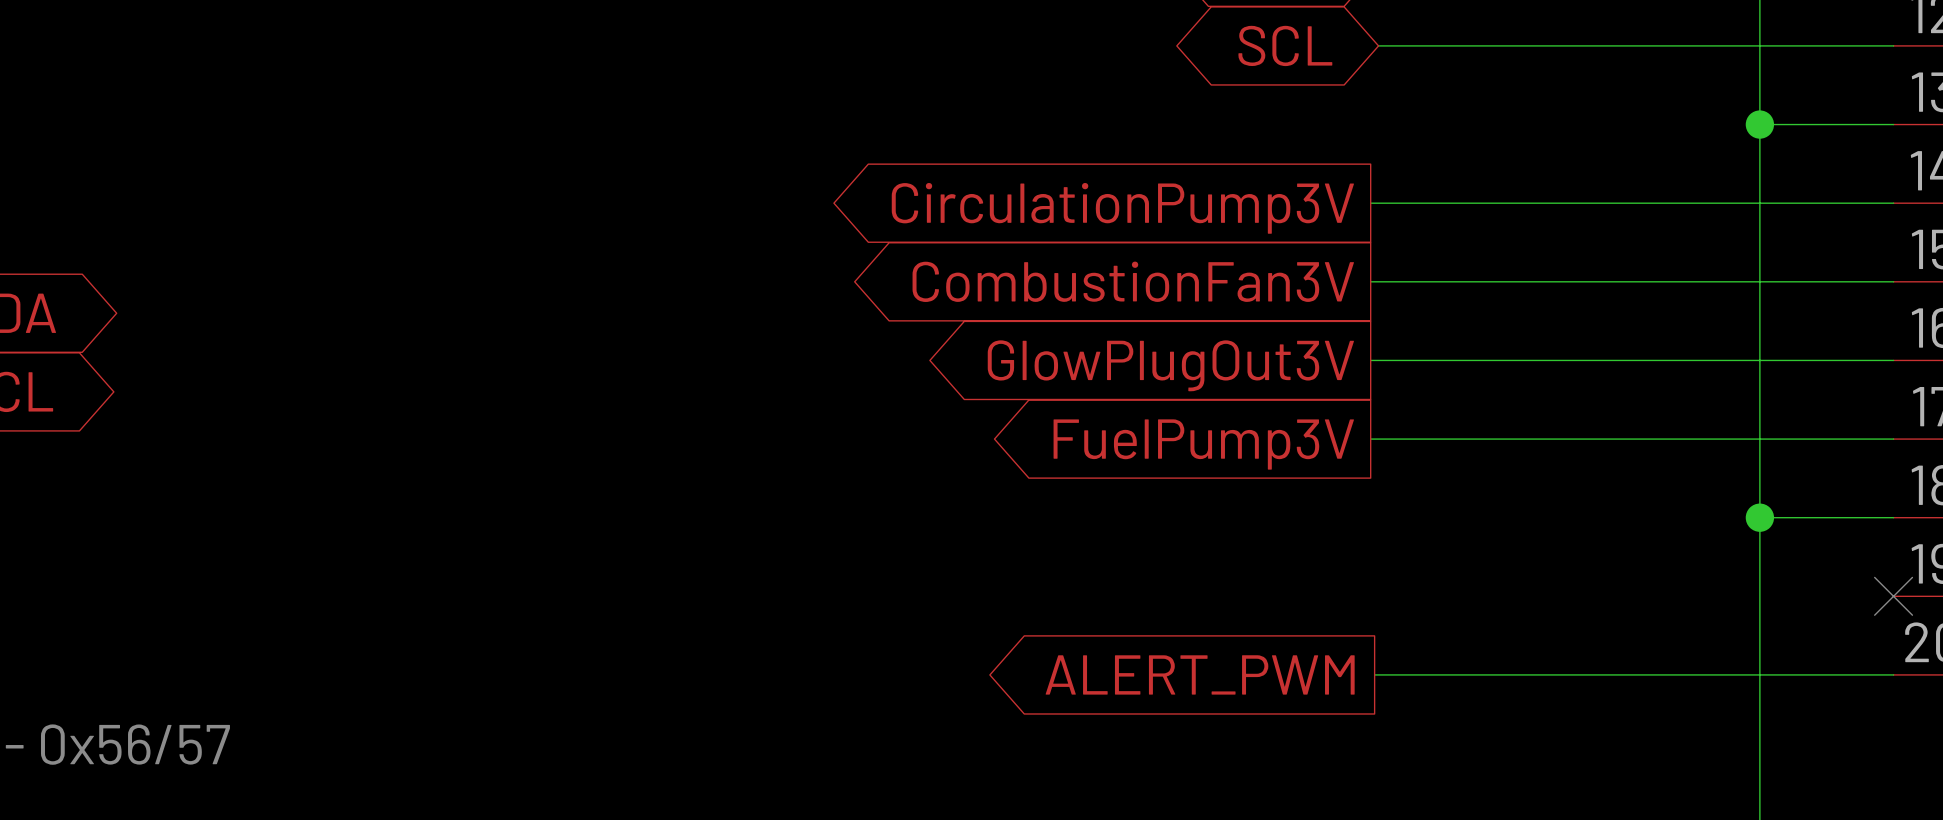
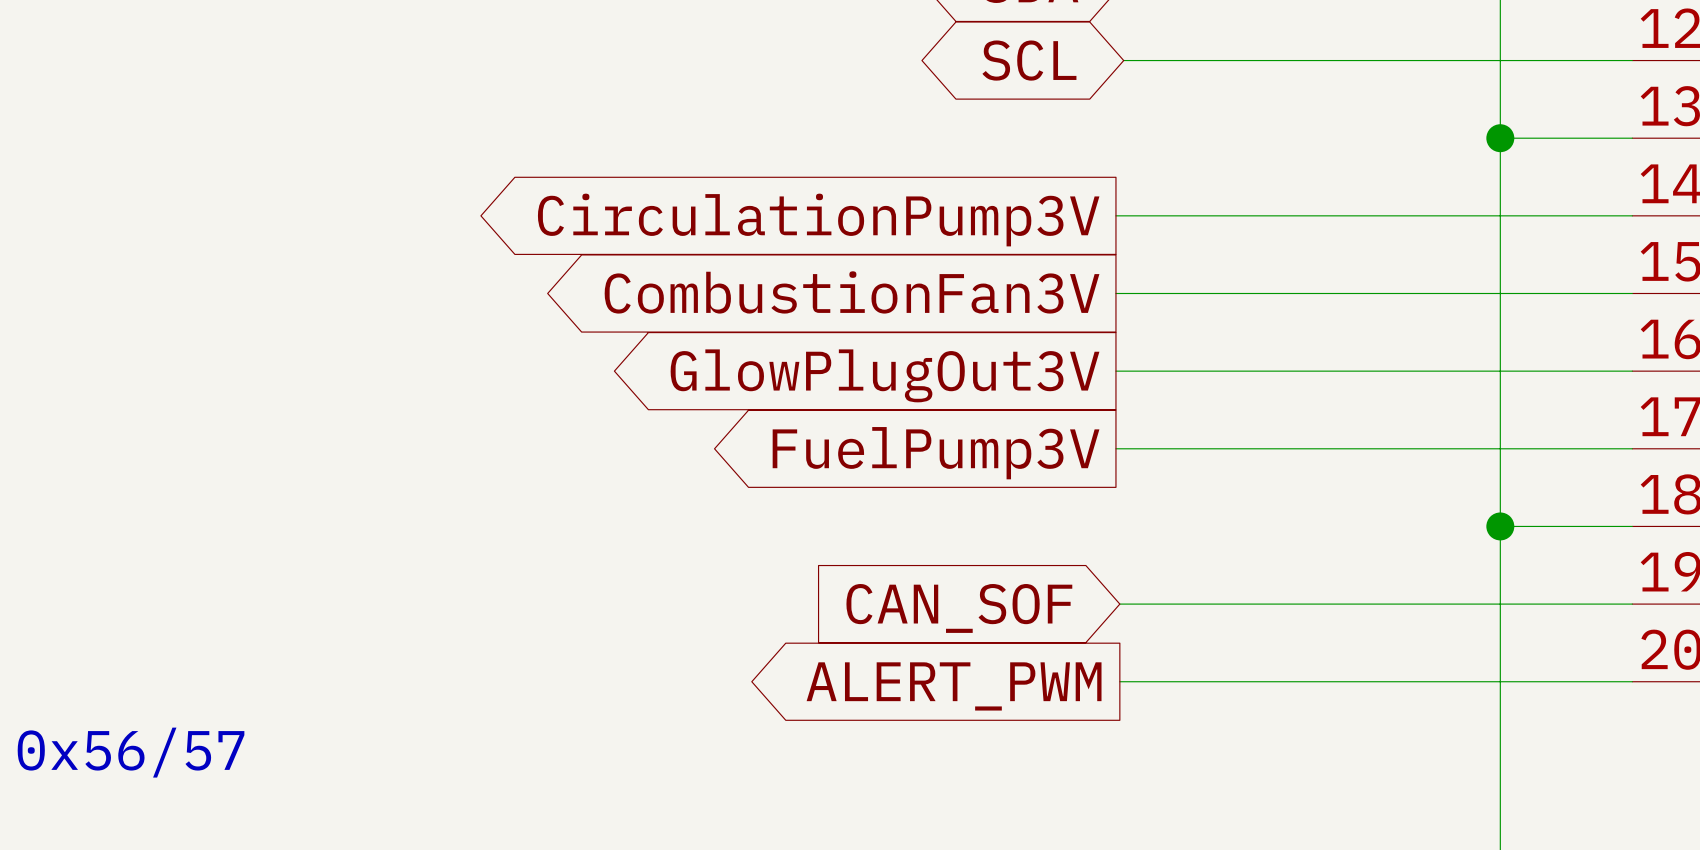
global label: none -> CAN_SOF (959, 608)
wire: none -> (1119, 604) (1632, 604)
no-connect mark: (1893, 596) -> none

